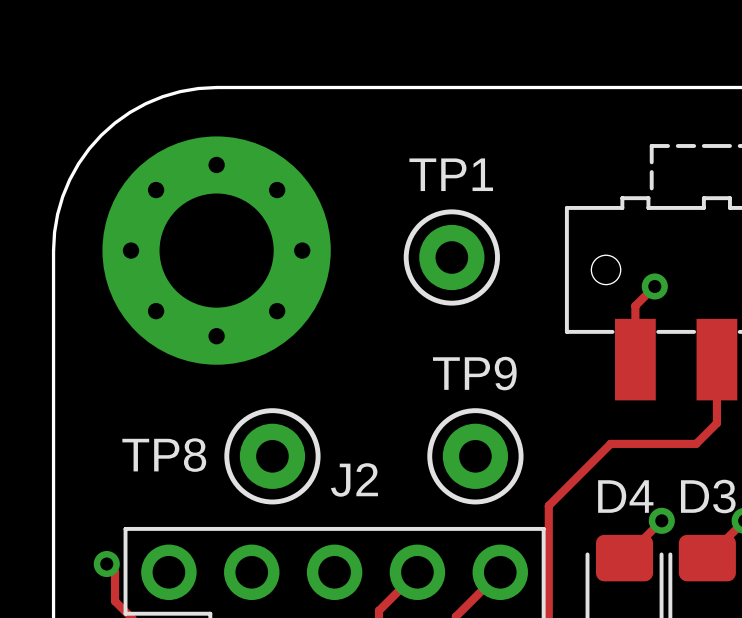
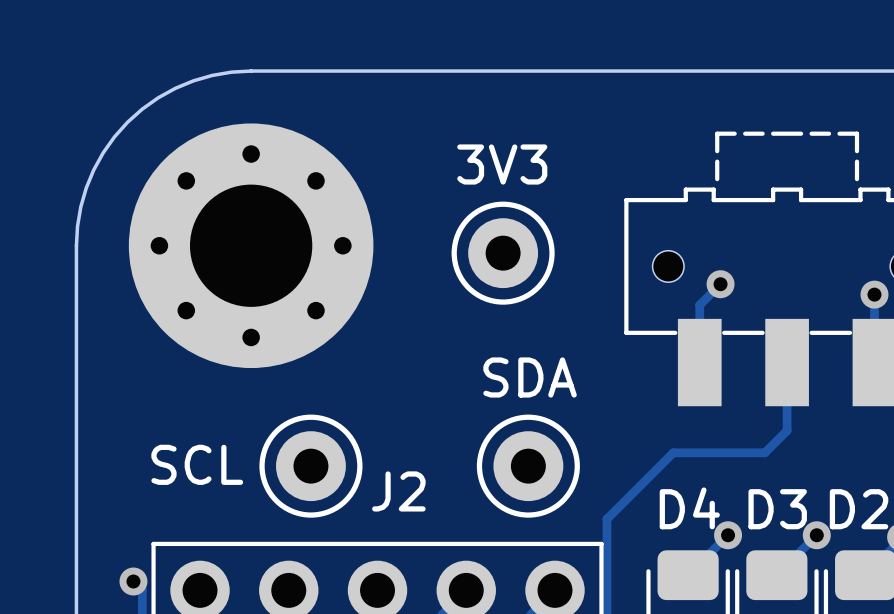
TP1 name: TP1 (451, 174) -> 3V3 (502, 164)
TP9 name: TP9 (474, 373) -> SDA (530, 377)
TP8 name: TP8 (164, 455) -> SCL (197, 464)

